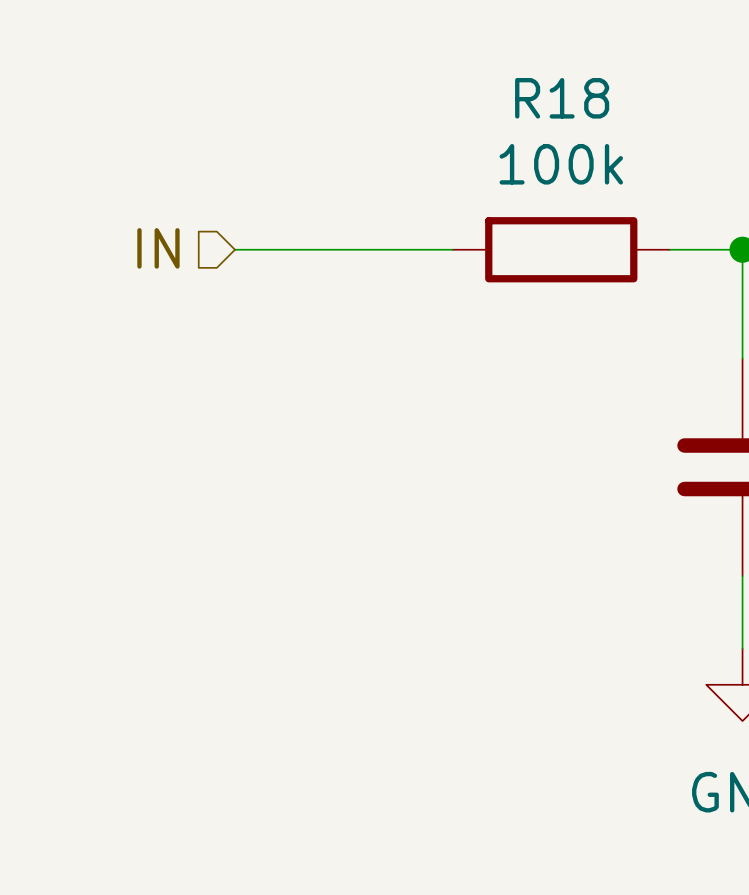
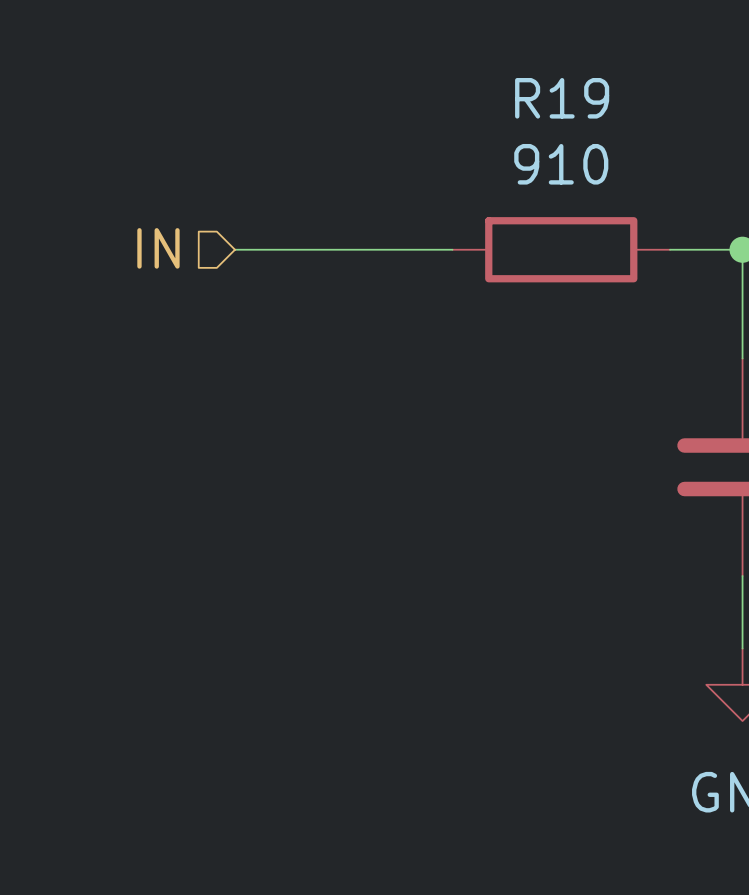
R18 name: R18 (562, 98) -> R19 (562, 98)
R18 value: 100k (561, 164) -> 910 (561, 164)

